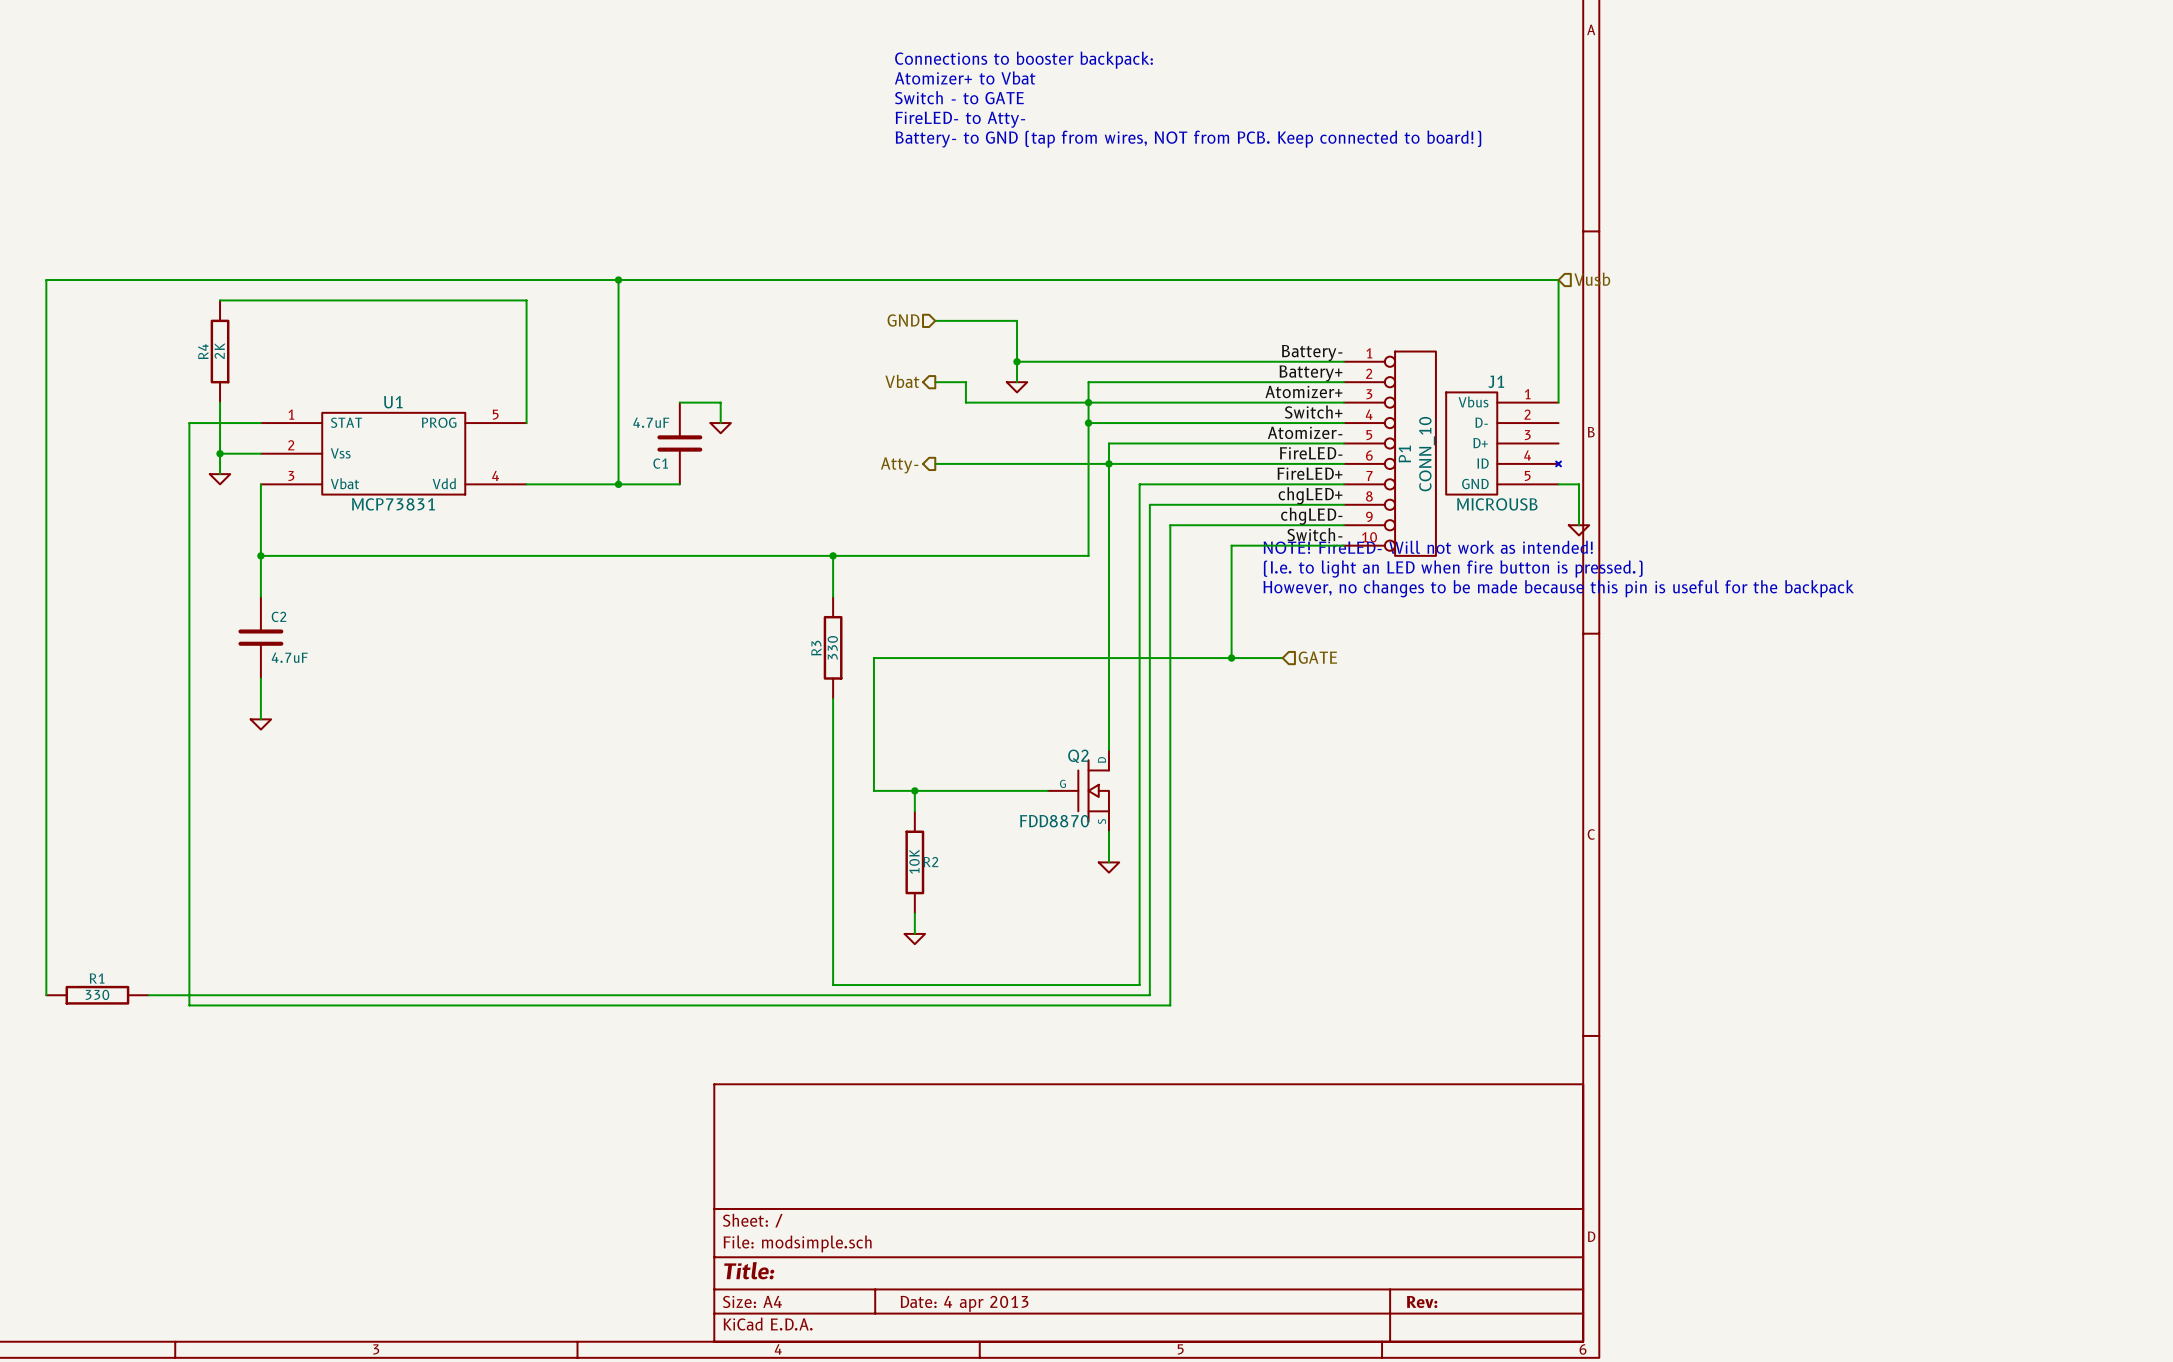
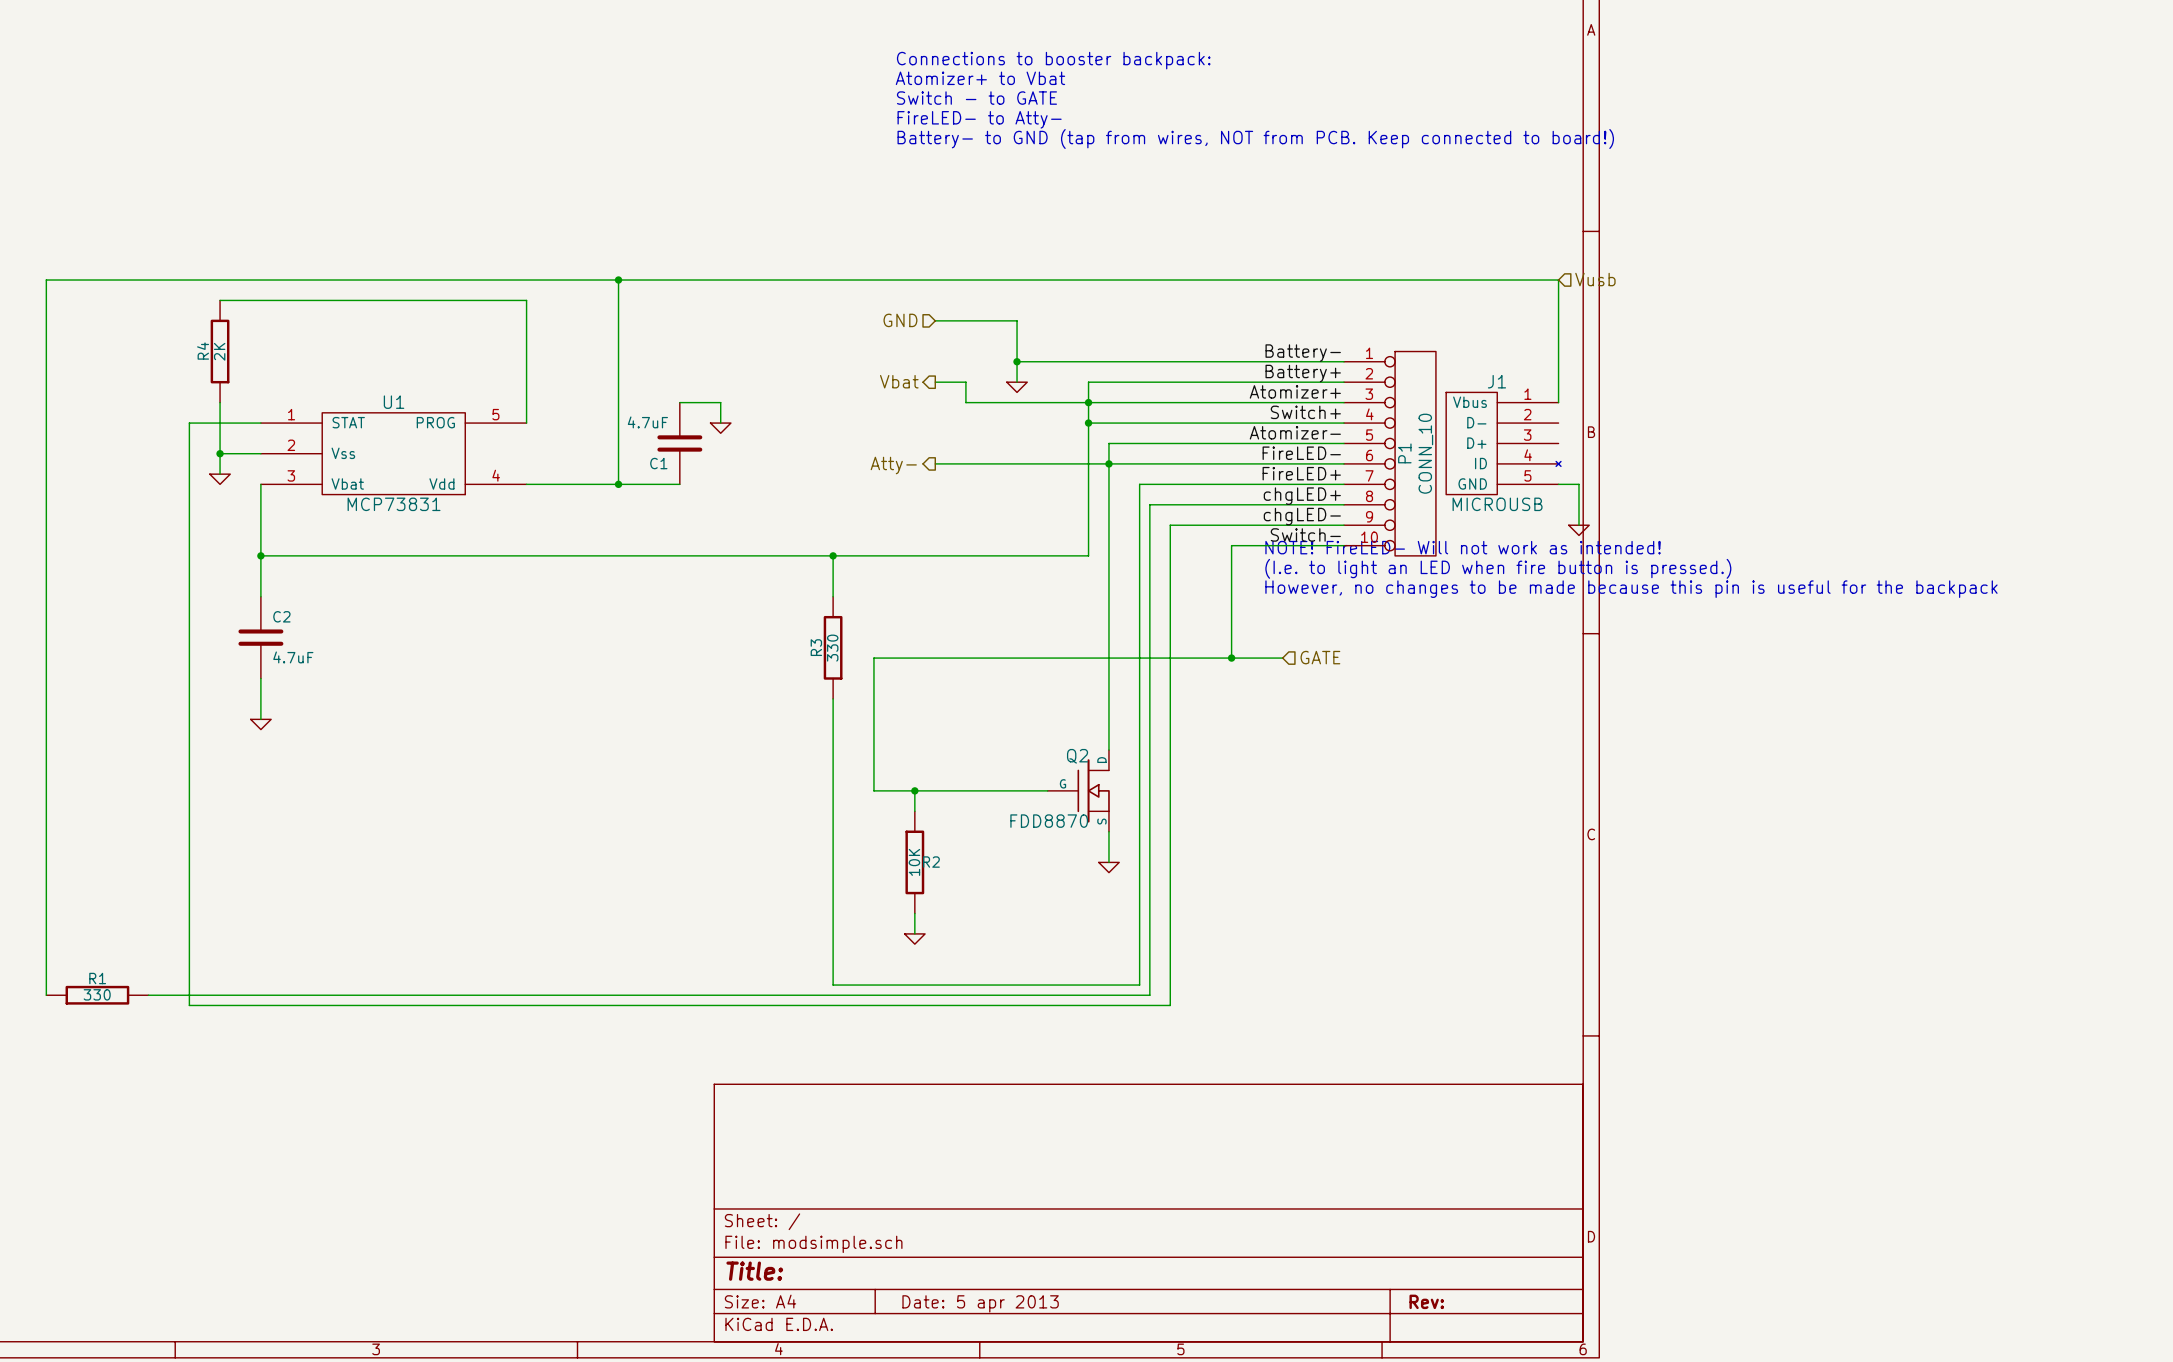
title block: Date: 4 apr 2013 (964, 1303) -> Date: 5 apr 2013 (980, 1303)

